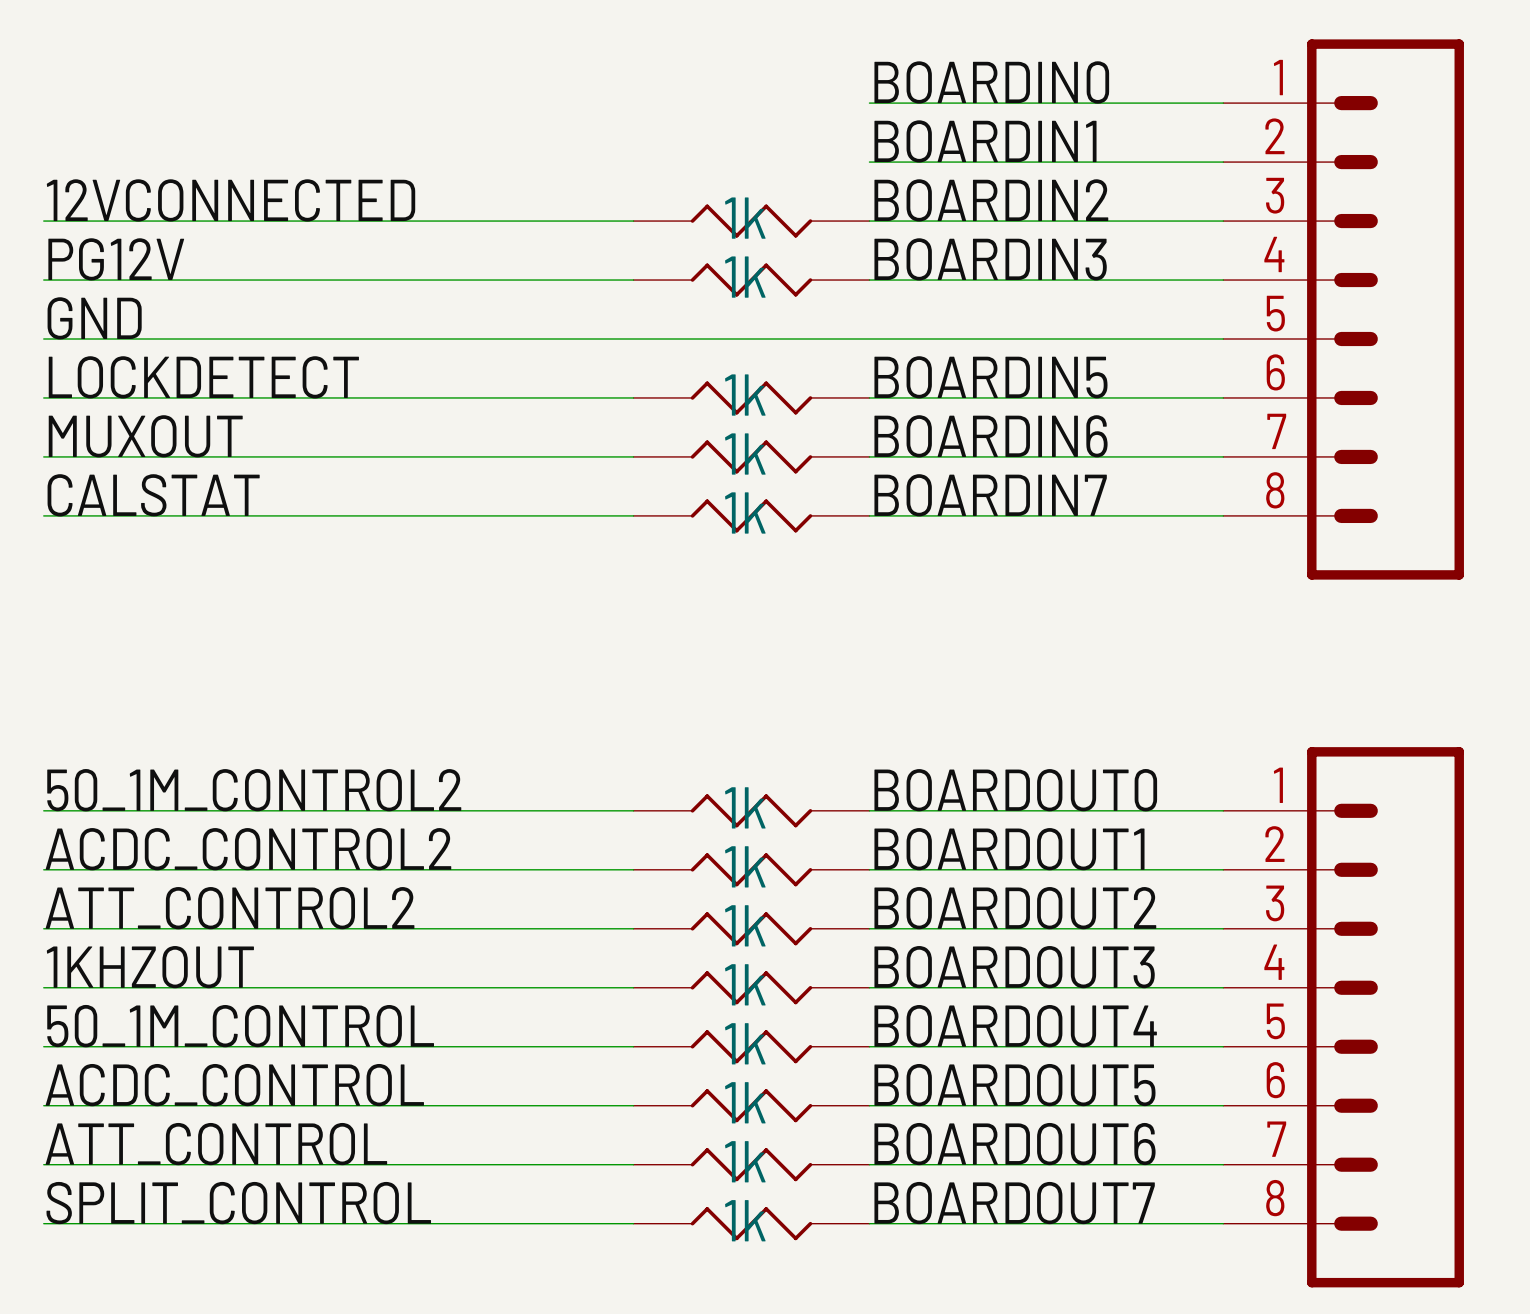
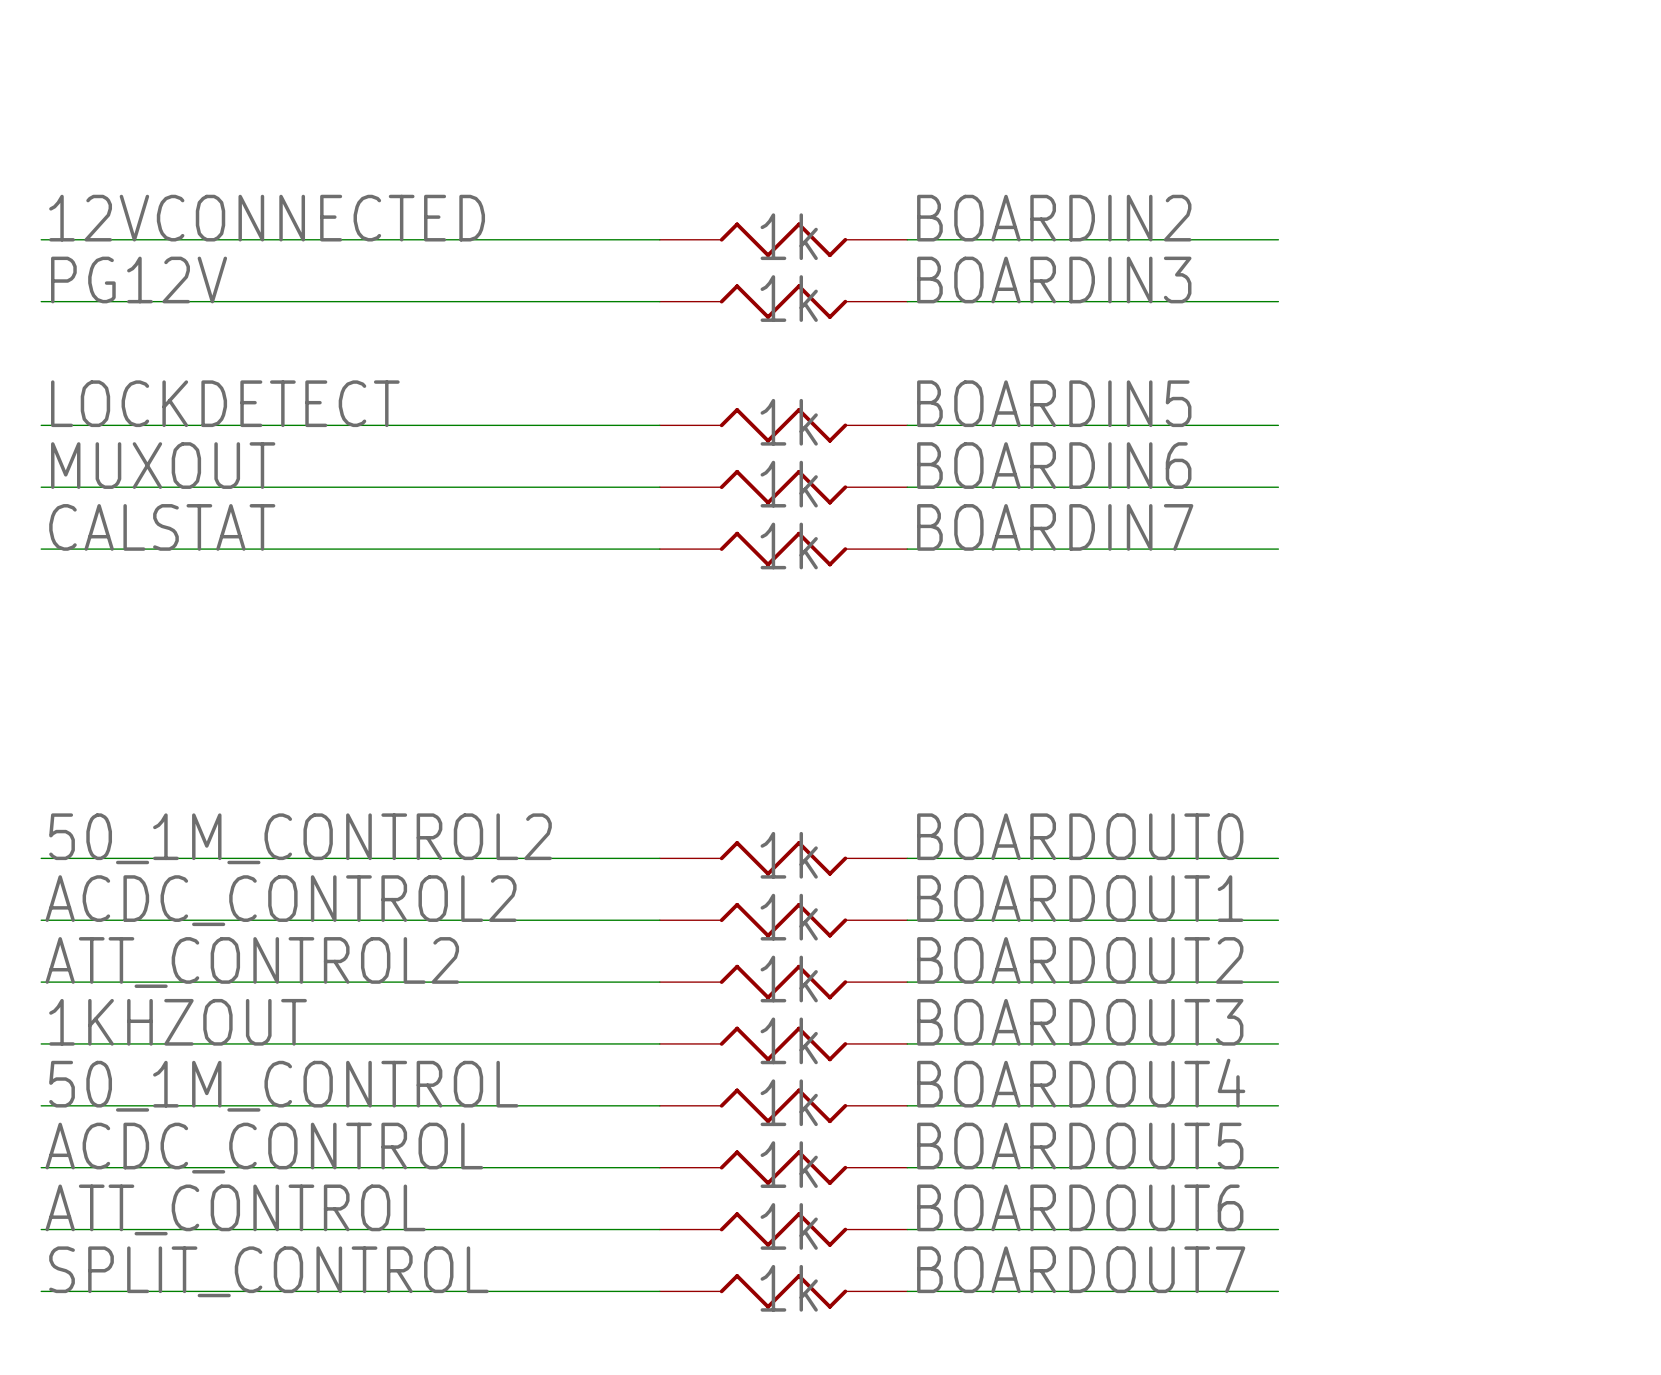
label: BOARDIN0 (991, 82) -> none
wire: (869, 103) (1223, 103) -> none
label: BOARDIN1 (985, 141) -> none
wire: (869, 162) (1223, 162) -> none
part: (1343, 309) -> none
label: GND (94, 318) -> none
wire: (43, 339) (1223, 339) -> none
part: (1343, 1017) -> none

